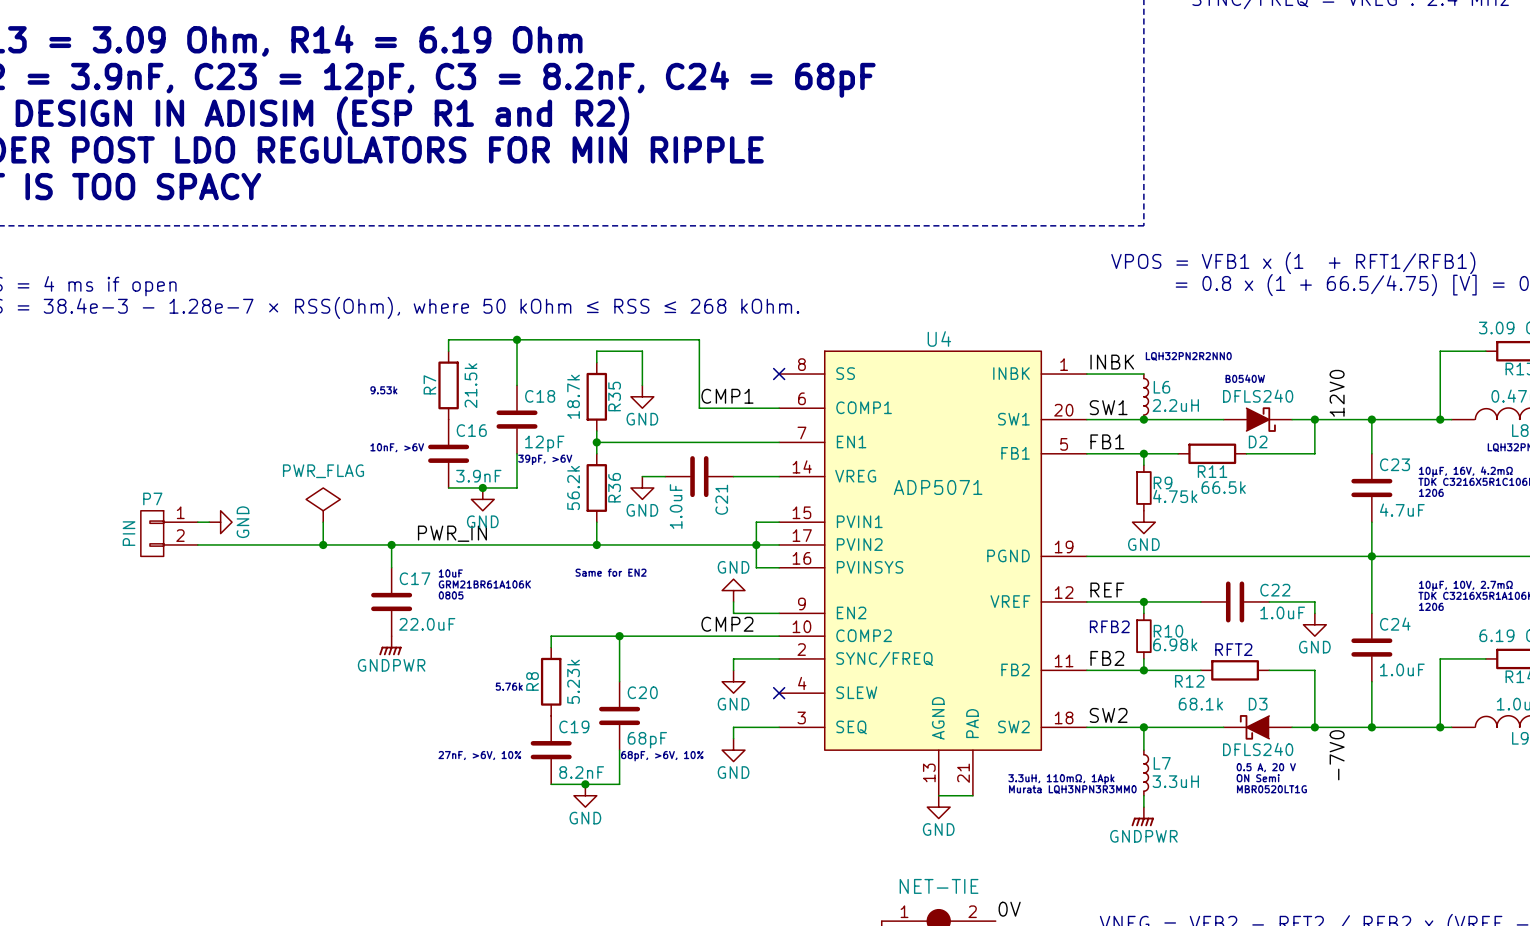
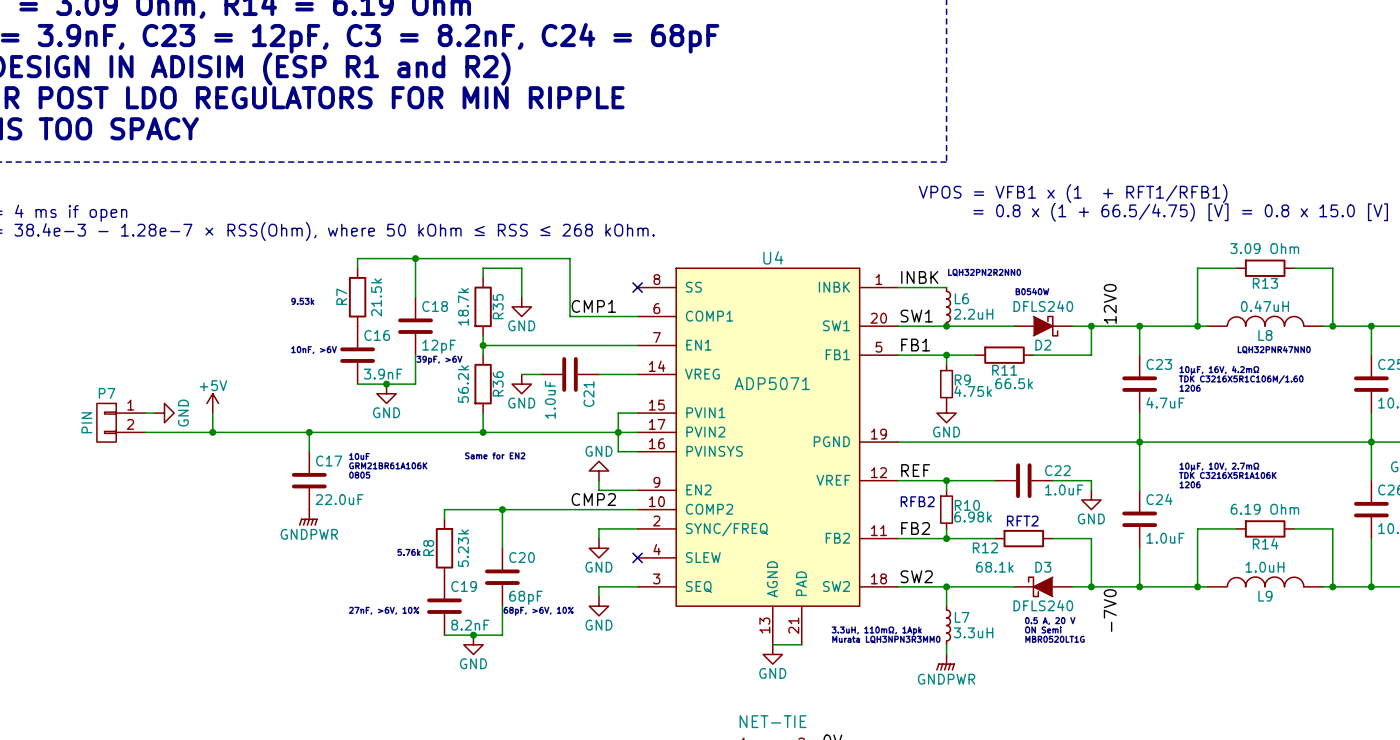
power symbol: PWR_FLAG (323, 505) -> none
power symbol: none -> +5V (212, 403)
wire: (323, 522) (323, 544) -> (212, 413) (212, 432)
label: PWR_IN (452, 533) -> none
junction position: (323, 544) -> (212, 432)

